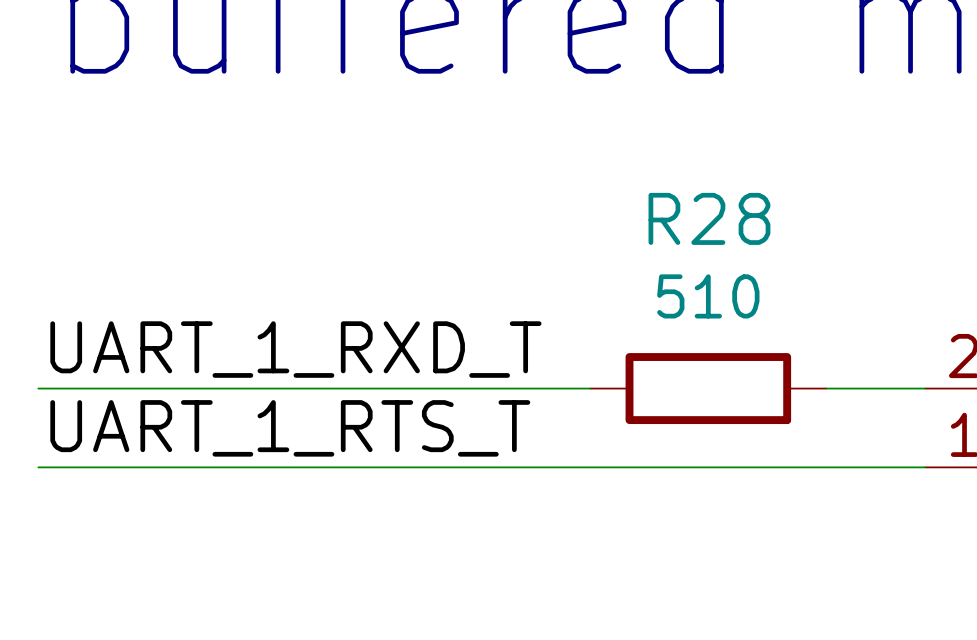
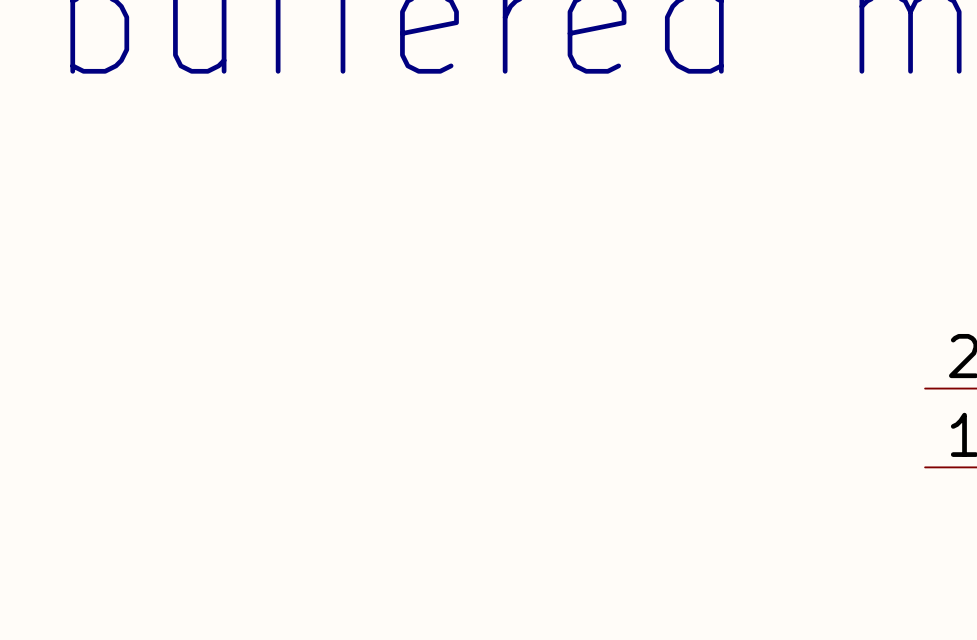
label: UART_1_RXD_T (295, 349) -> none
wire: (38, 388) (590, 388) -> none
R28: (708, 388) -> none
wire: (826, 388) (925, 388) -> none
label: UART_1_RTS_T (290, 428) -> none
wire: (38, 467) (925, 467) -> none

